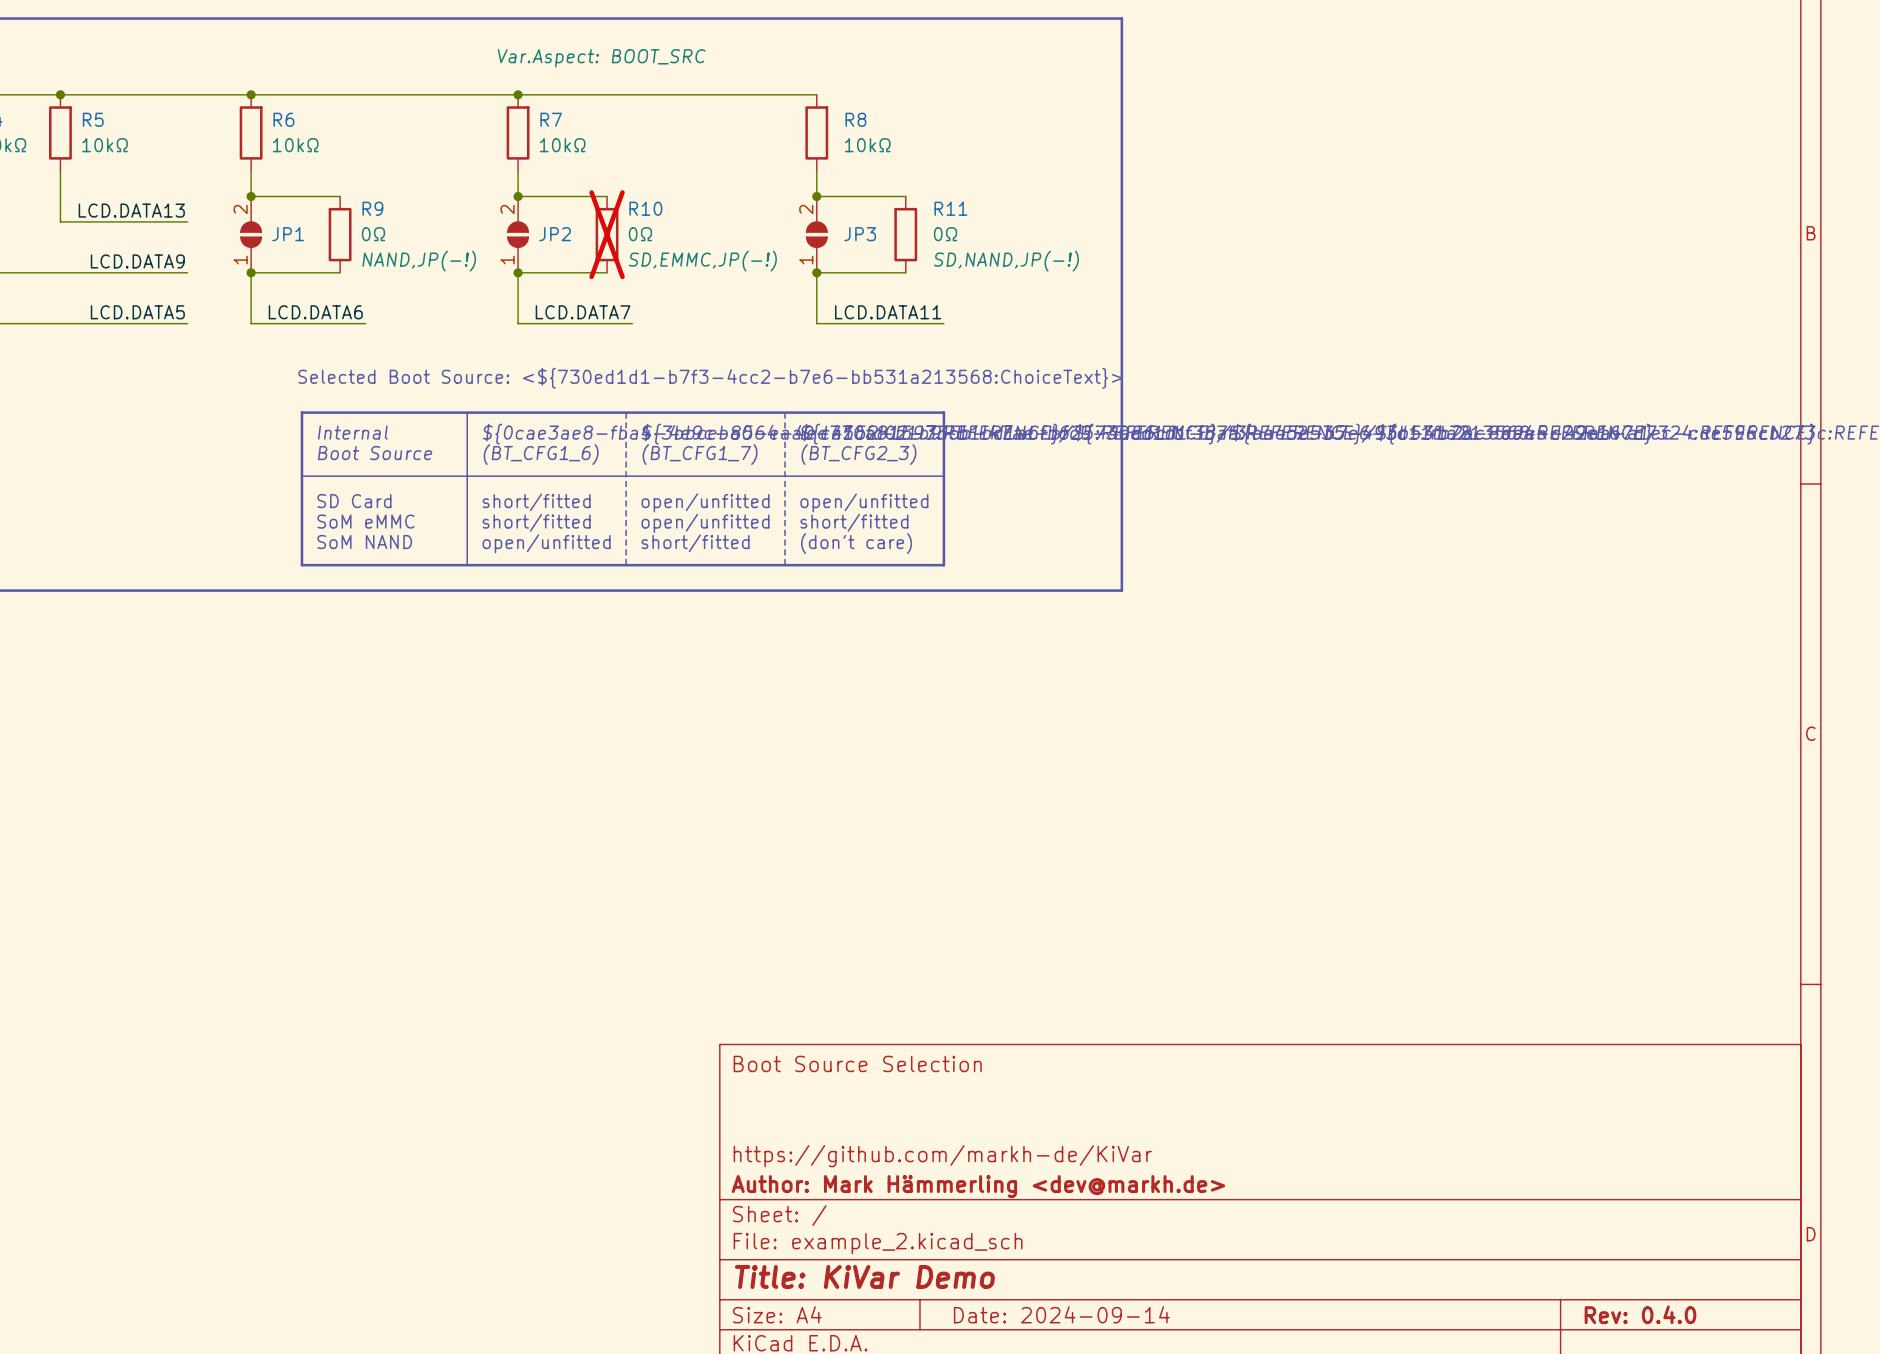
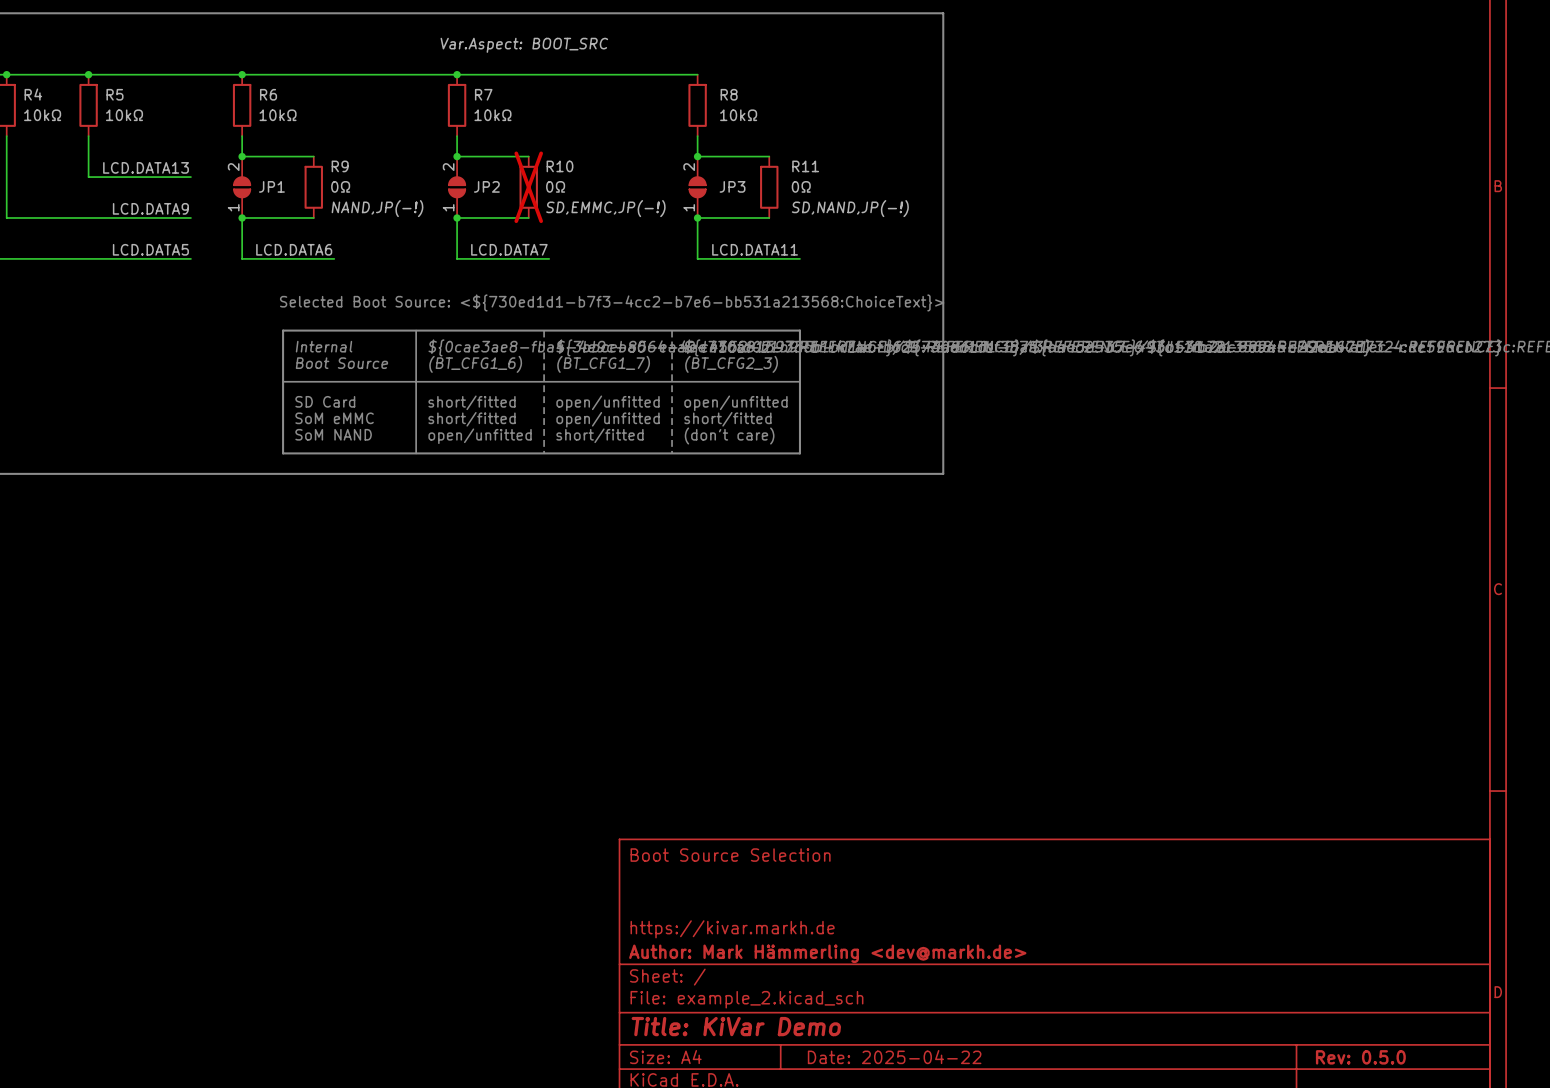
title block: https://github.com/markh-de/KiVar (942, 1156) -> https://kivar.markh.de (732, 929)
title block: Date: 2024-09-14 (1061, 1314) -> Date: 2025-04-22 (894, 1057)
title block: Rev: 0.4.0 (1640, 1314) -> Rev: 0.5.0 (1360, 1057)

